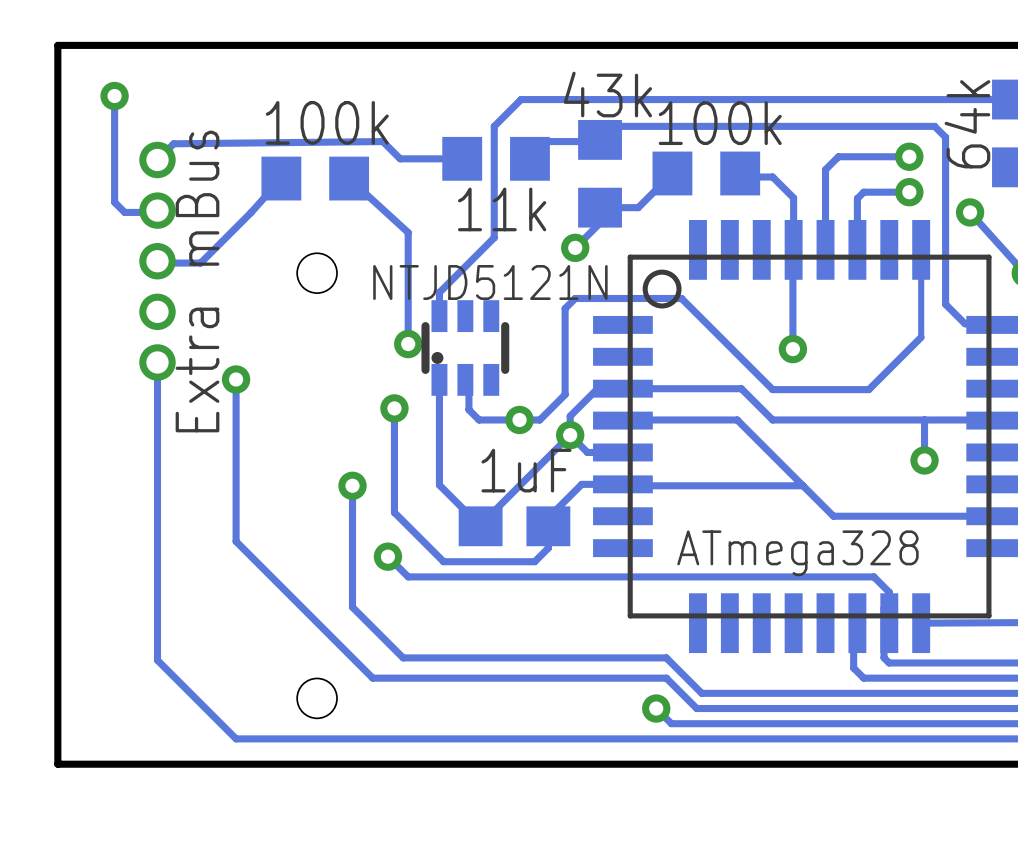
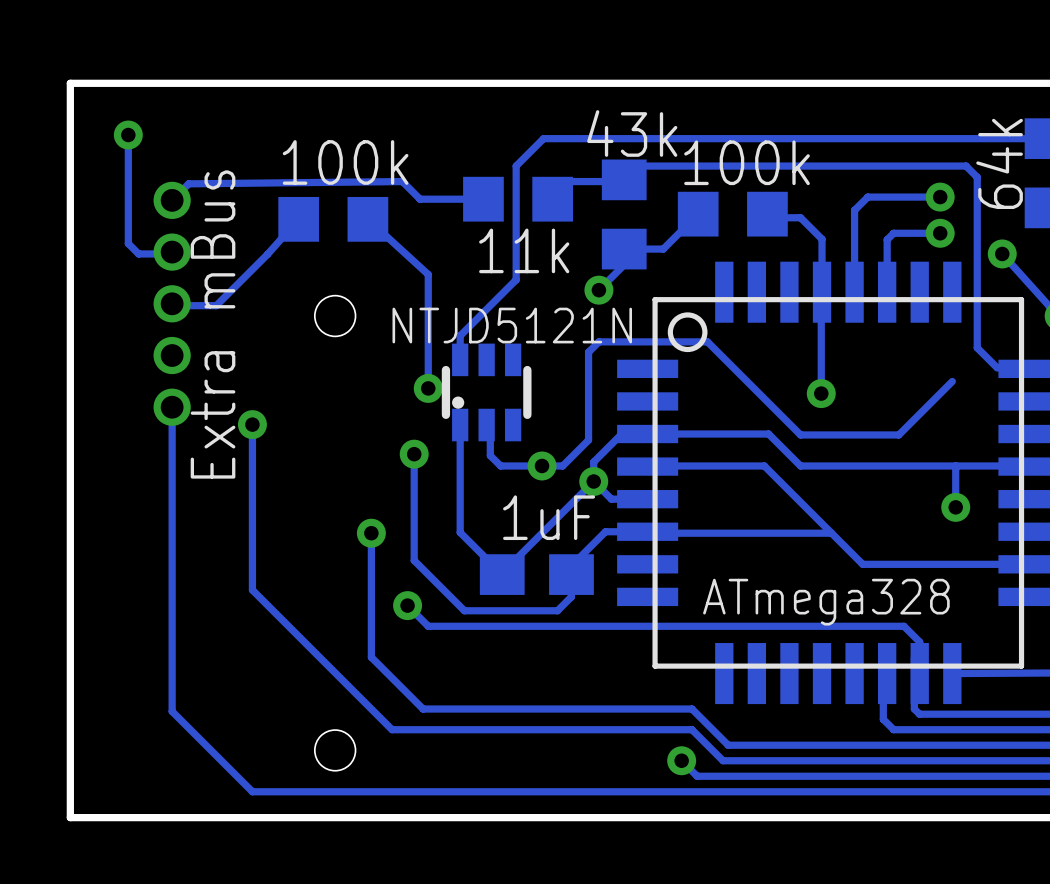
track: (921, 249) (921, 337) -> none

